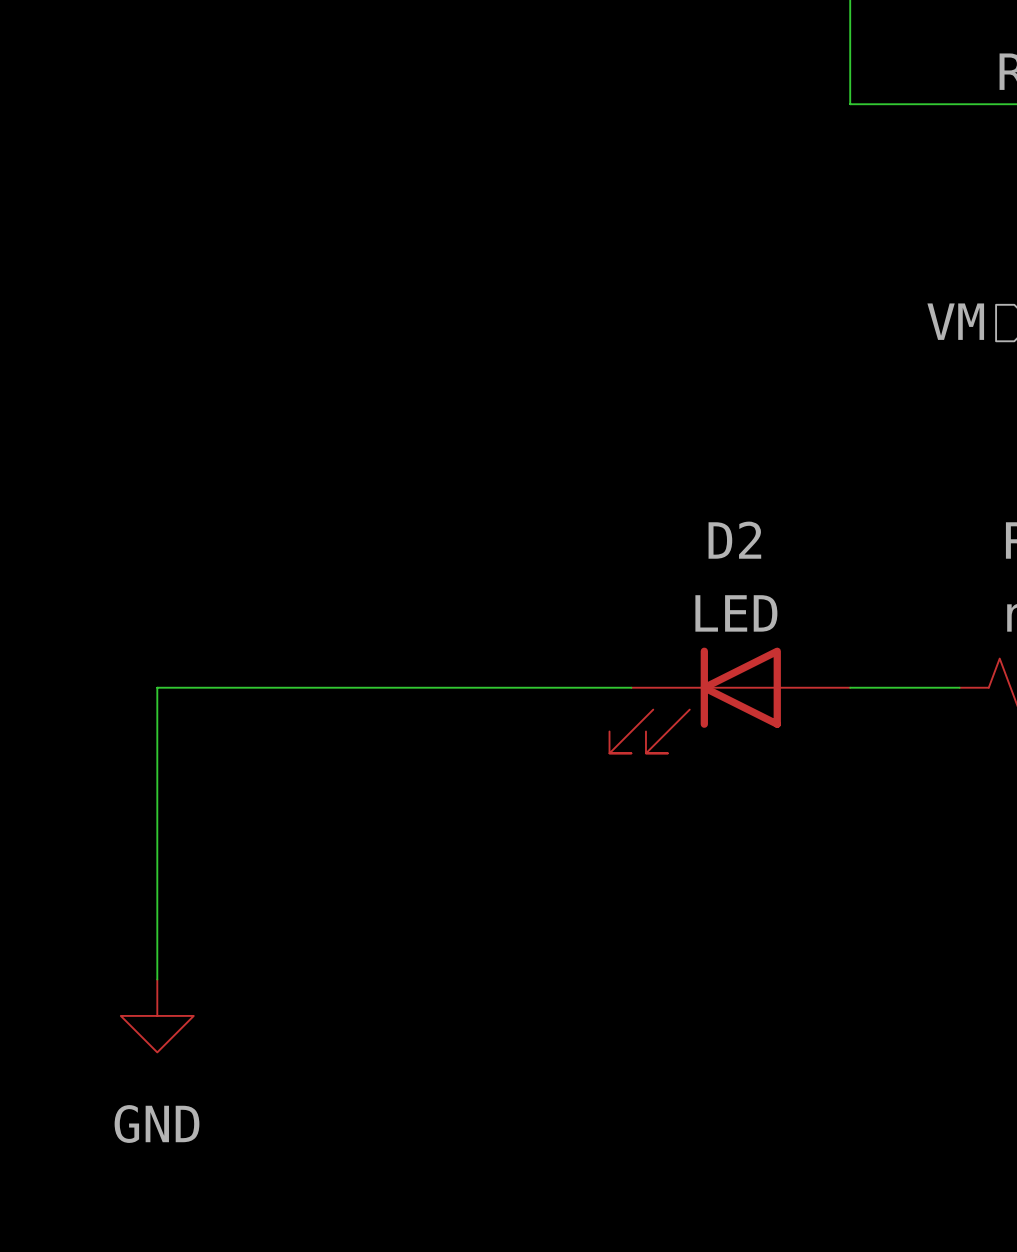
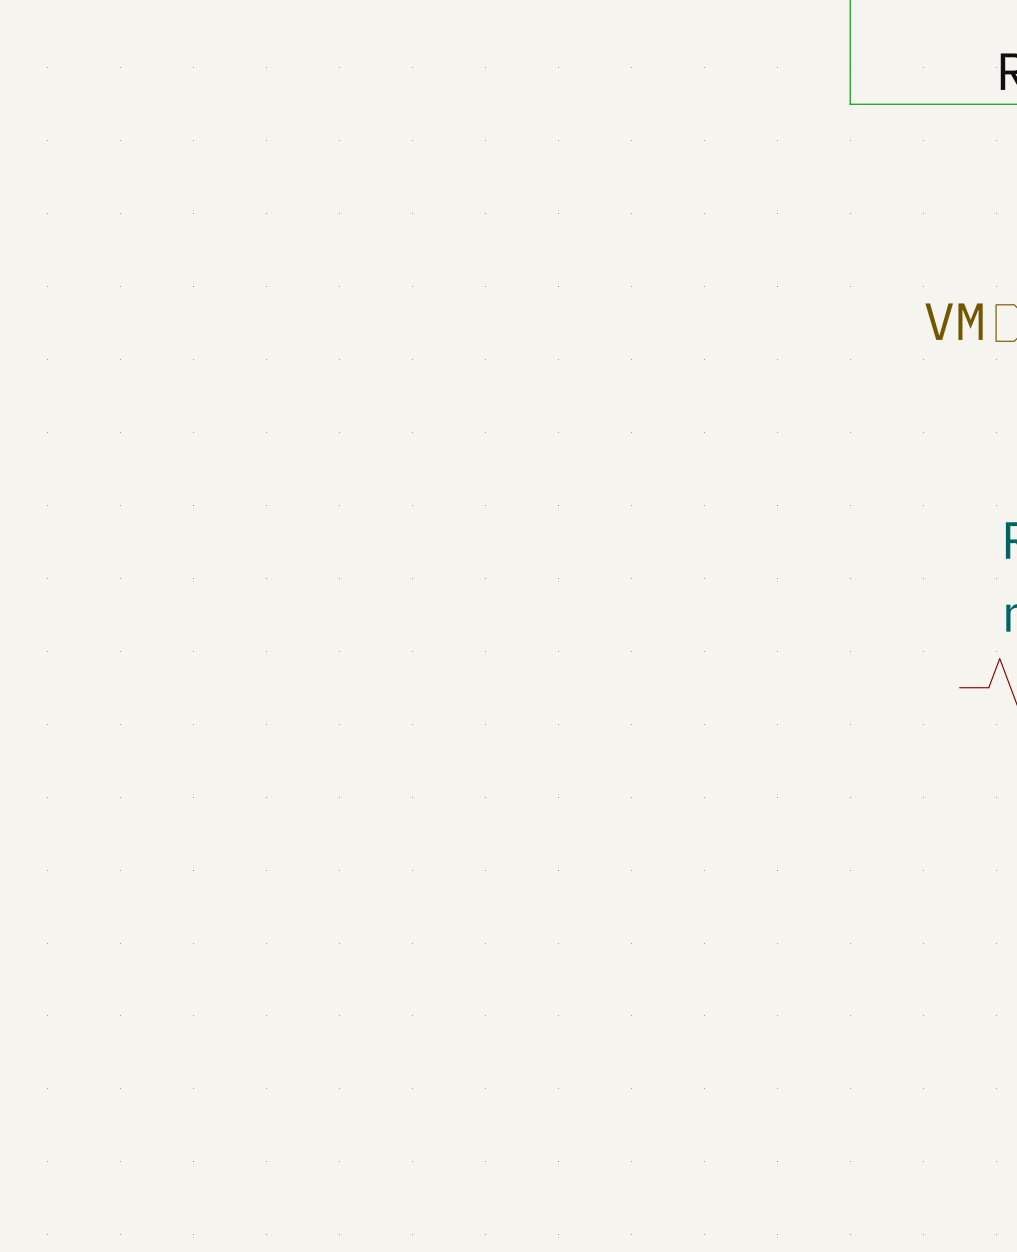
wire: (631, 687) (157, 687) (157, 979) -> none
wire: (850, 687) (959, 687) -> none
D2: LED (729, 700) -> none
power symbol: GND (157, 1015) -> none

